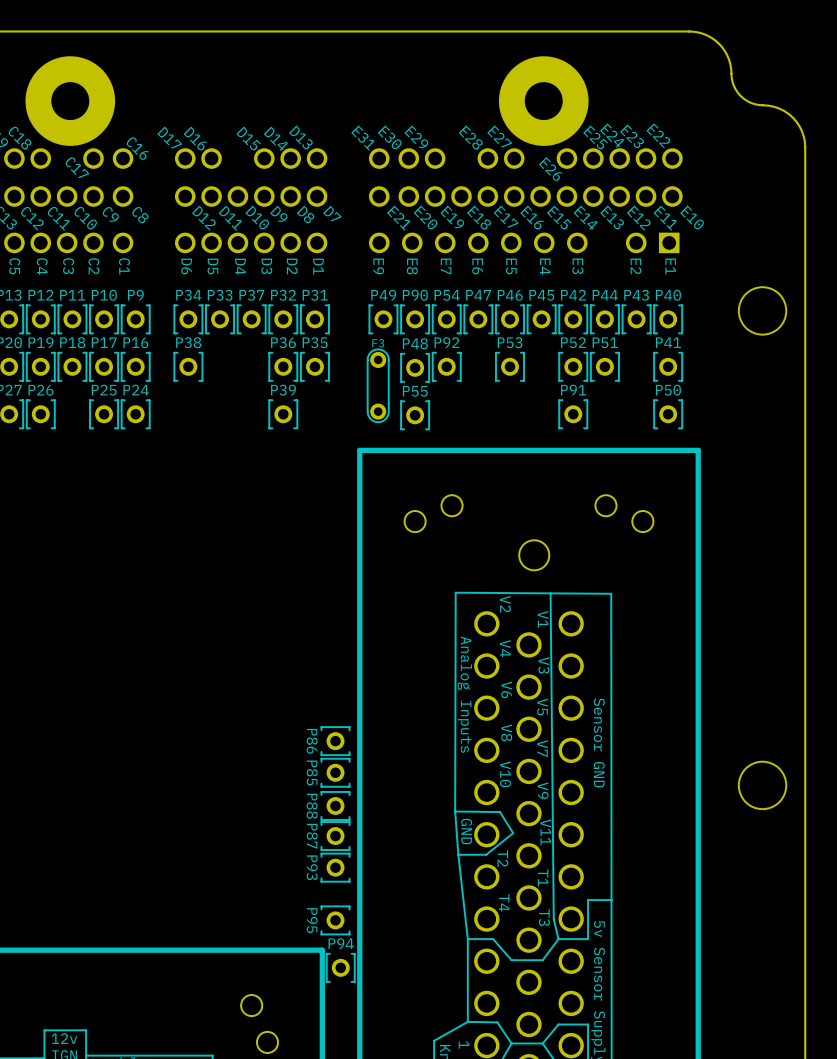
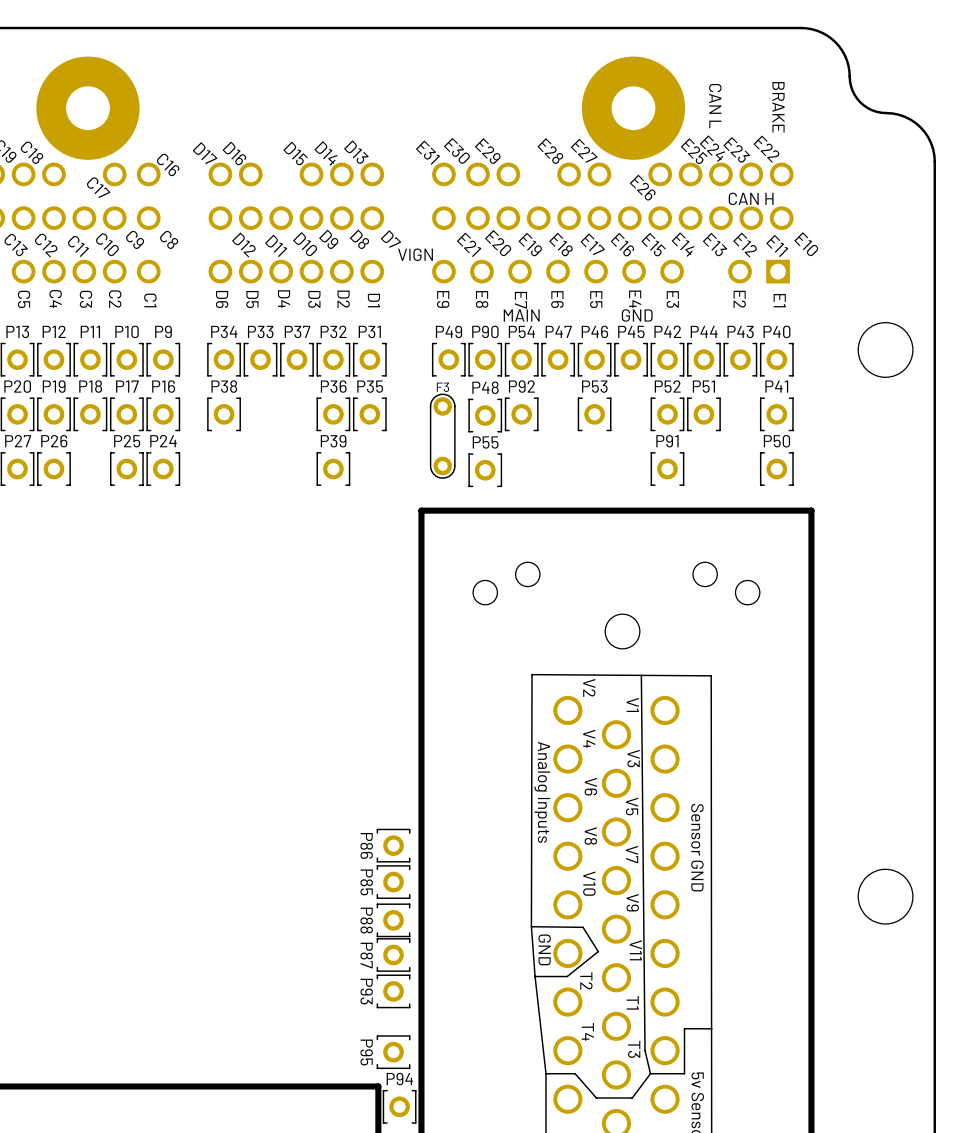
text: none -> CAN L (715, 106)
text: none -> BRAKE (778, 107)
text: none -> CAN H (751, 198)
text: none -> VIGN (415, 254)
text: none -> MAIN (521, 315)
text: none -> GND (637, 315)

